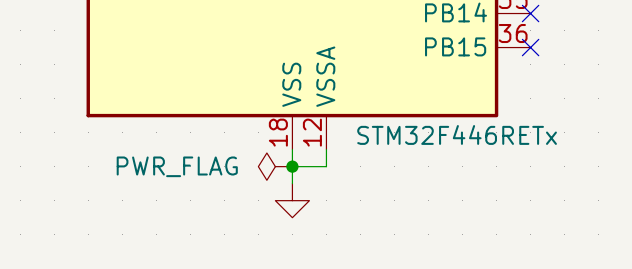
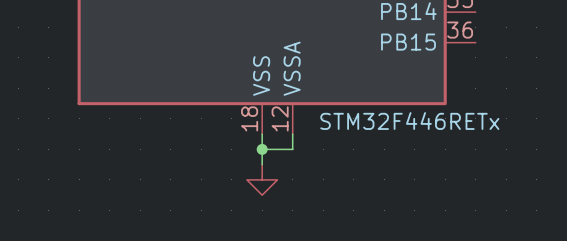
no-connect mark: (530, 13) -> none
no-connect mark: (530, 47) -> none
power symbol: PWR_FLAG (275, 166) -> none

